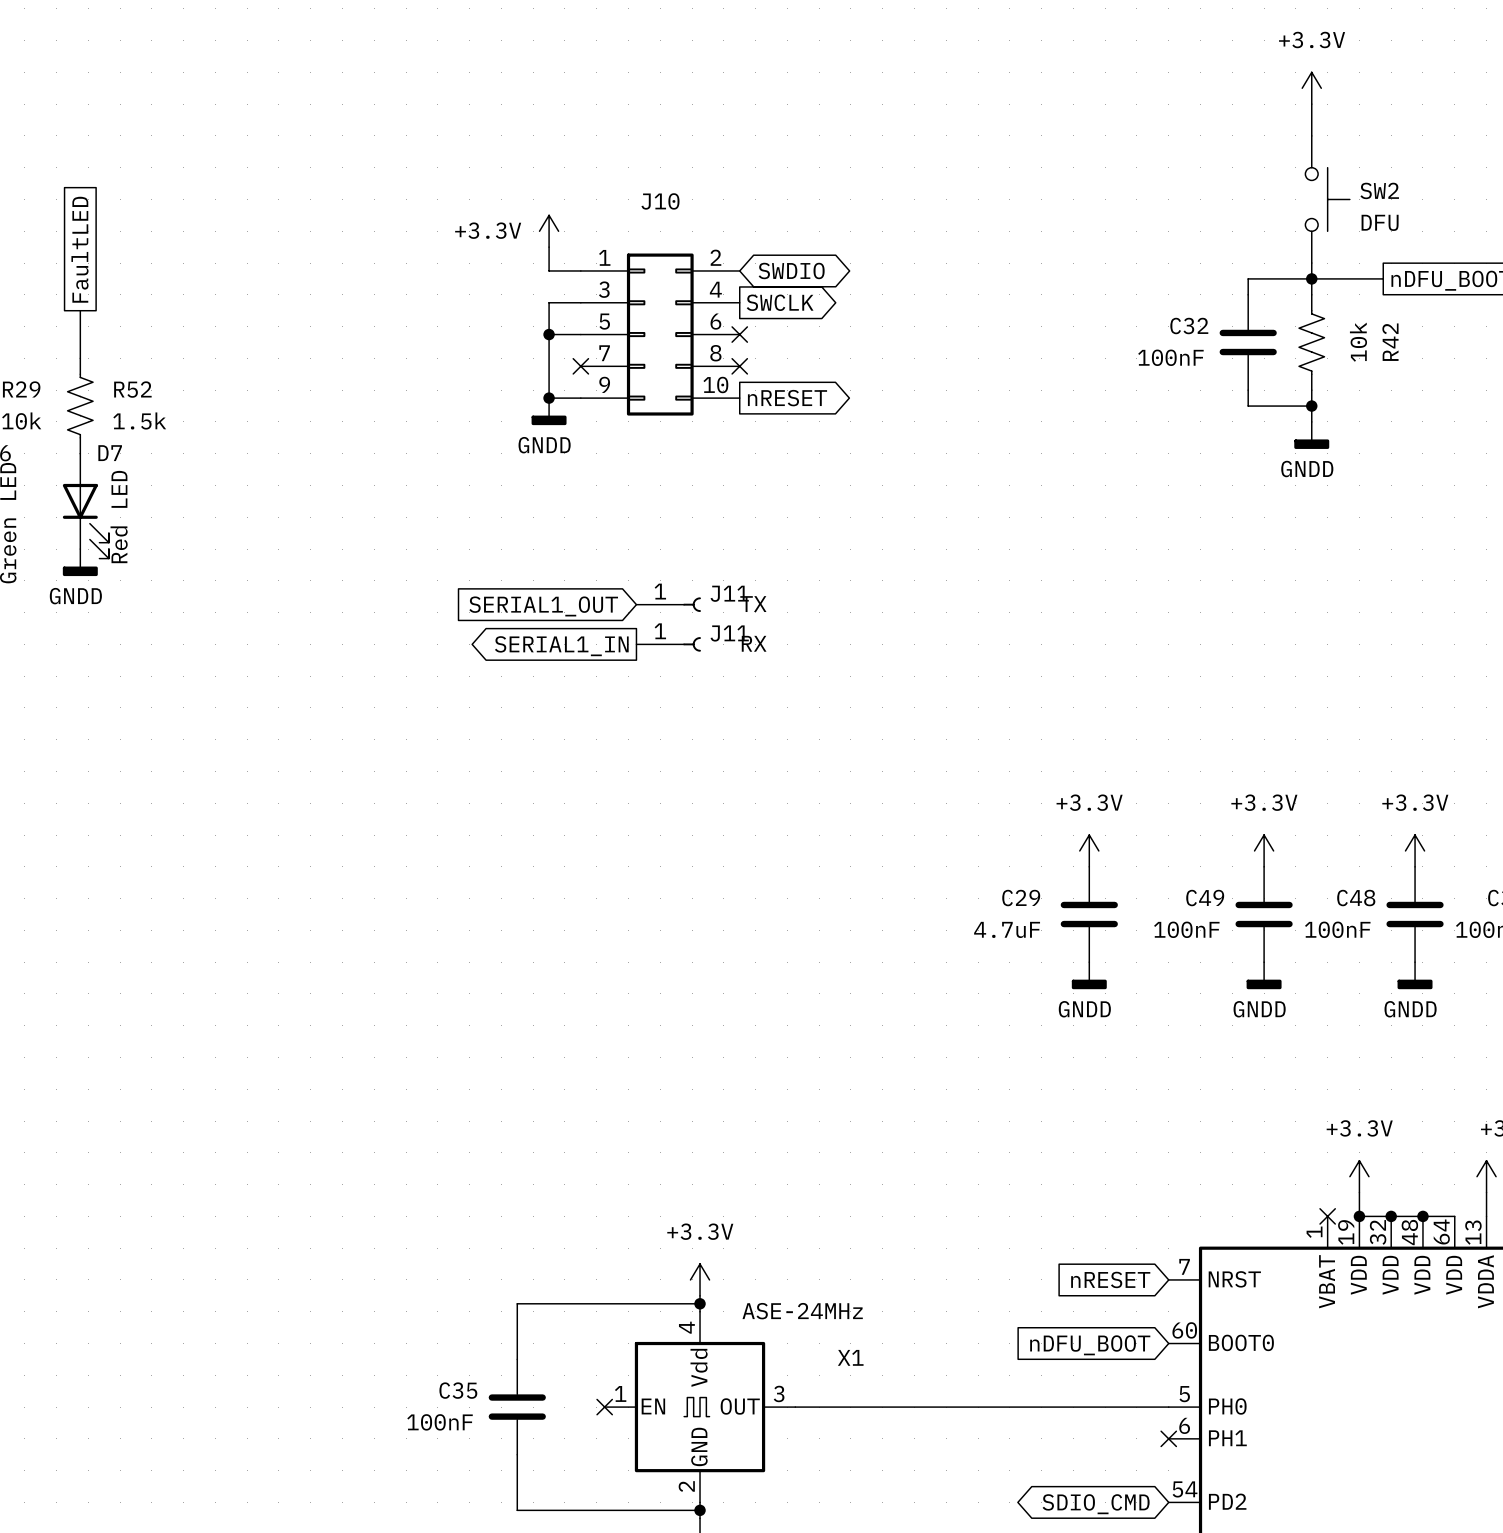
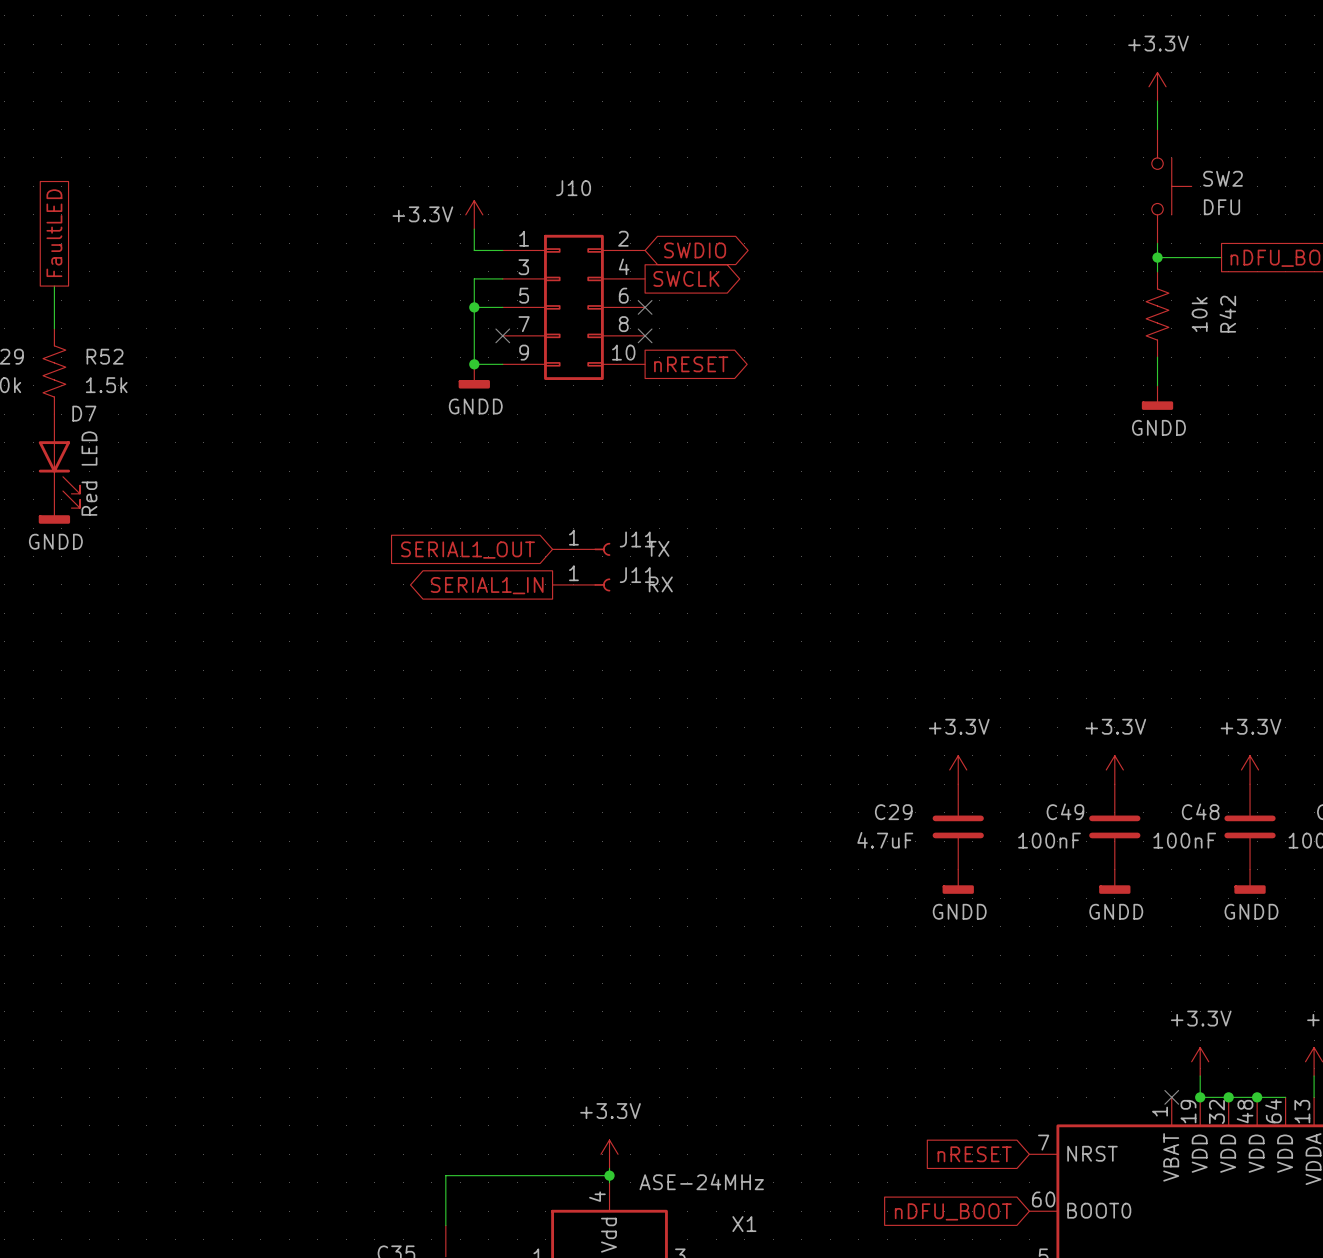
wire: (1311, 278) (1248, 278) (1248, 294) -> none
C32: 100nF (1248, 342) -> none
wire: (1248, 390) (1248, 406) (1311, 406) -> none
junction: (1311, 406) -> none

